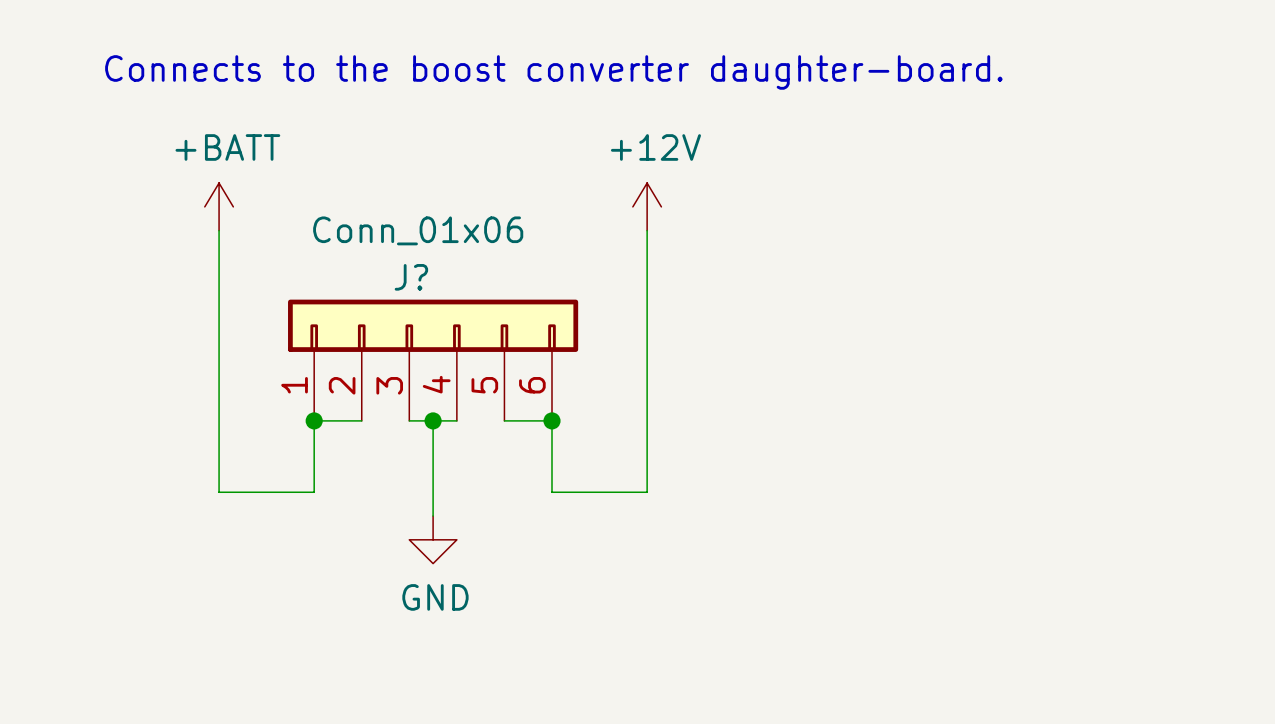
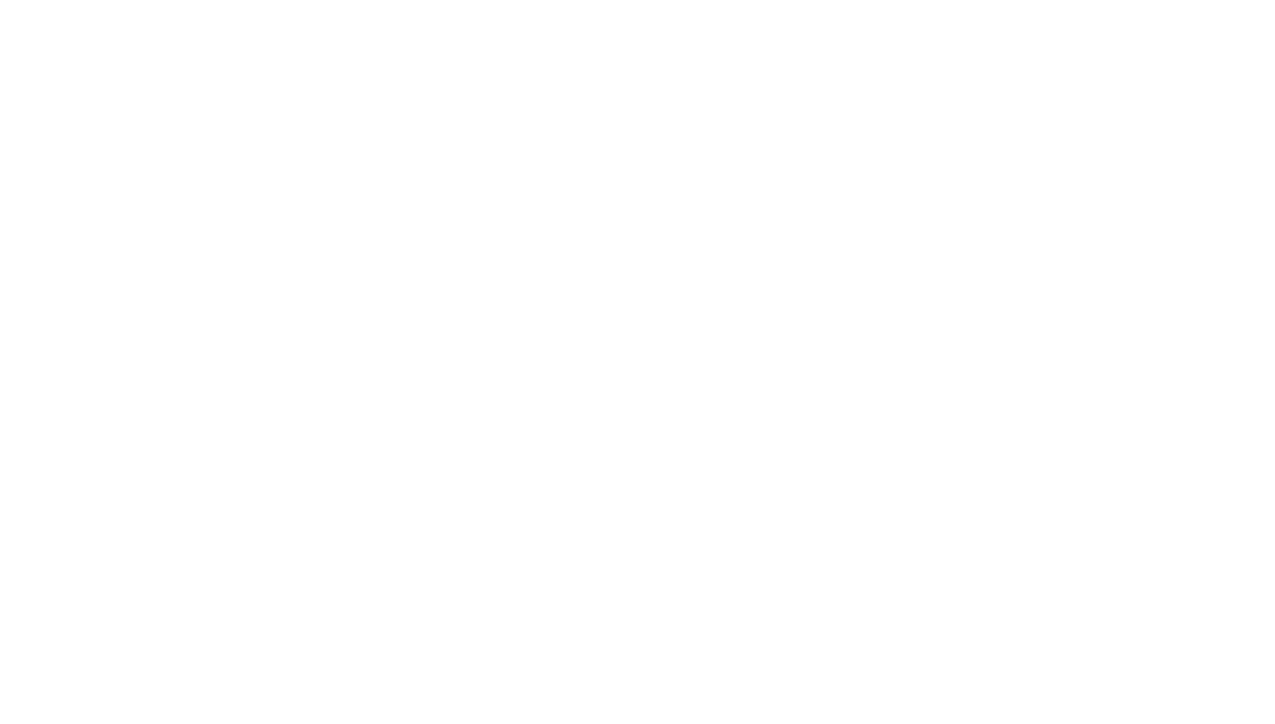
text: Connects to the boost converter daughter-board. (553, 72) -> none
power symbol: +BATT (219, 206) -> none
power symbol: +12V (647, 206) -> none
wire: (219, 230) (219, 492) (314, 492) (314, 420) (361, 420) -> none
wire: (647, 230) (647, 492) (552, 492) (552, 420) (504, 420) -> none
J?: Conn_01x06 (433, 360) -> none
junction: (314, 420) -> none
wire: (409, 420) (456, 420) -> none
wire: (433, 420) (433, 516) -> none
junction: (433, 420) -> none
junction: (552, 420) -> none
power symbol: GND (433, 539) -> none

